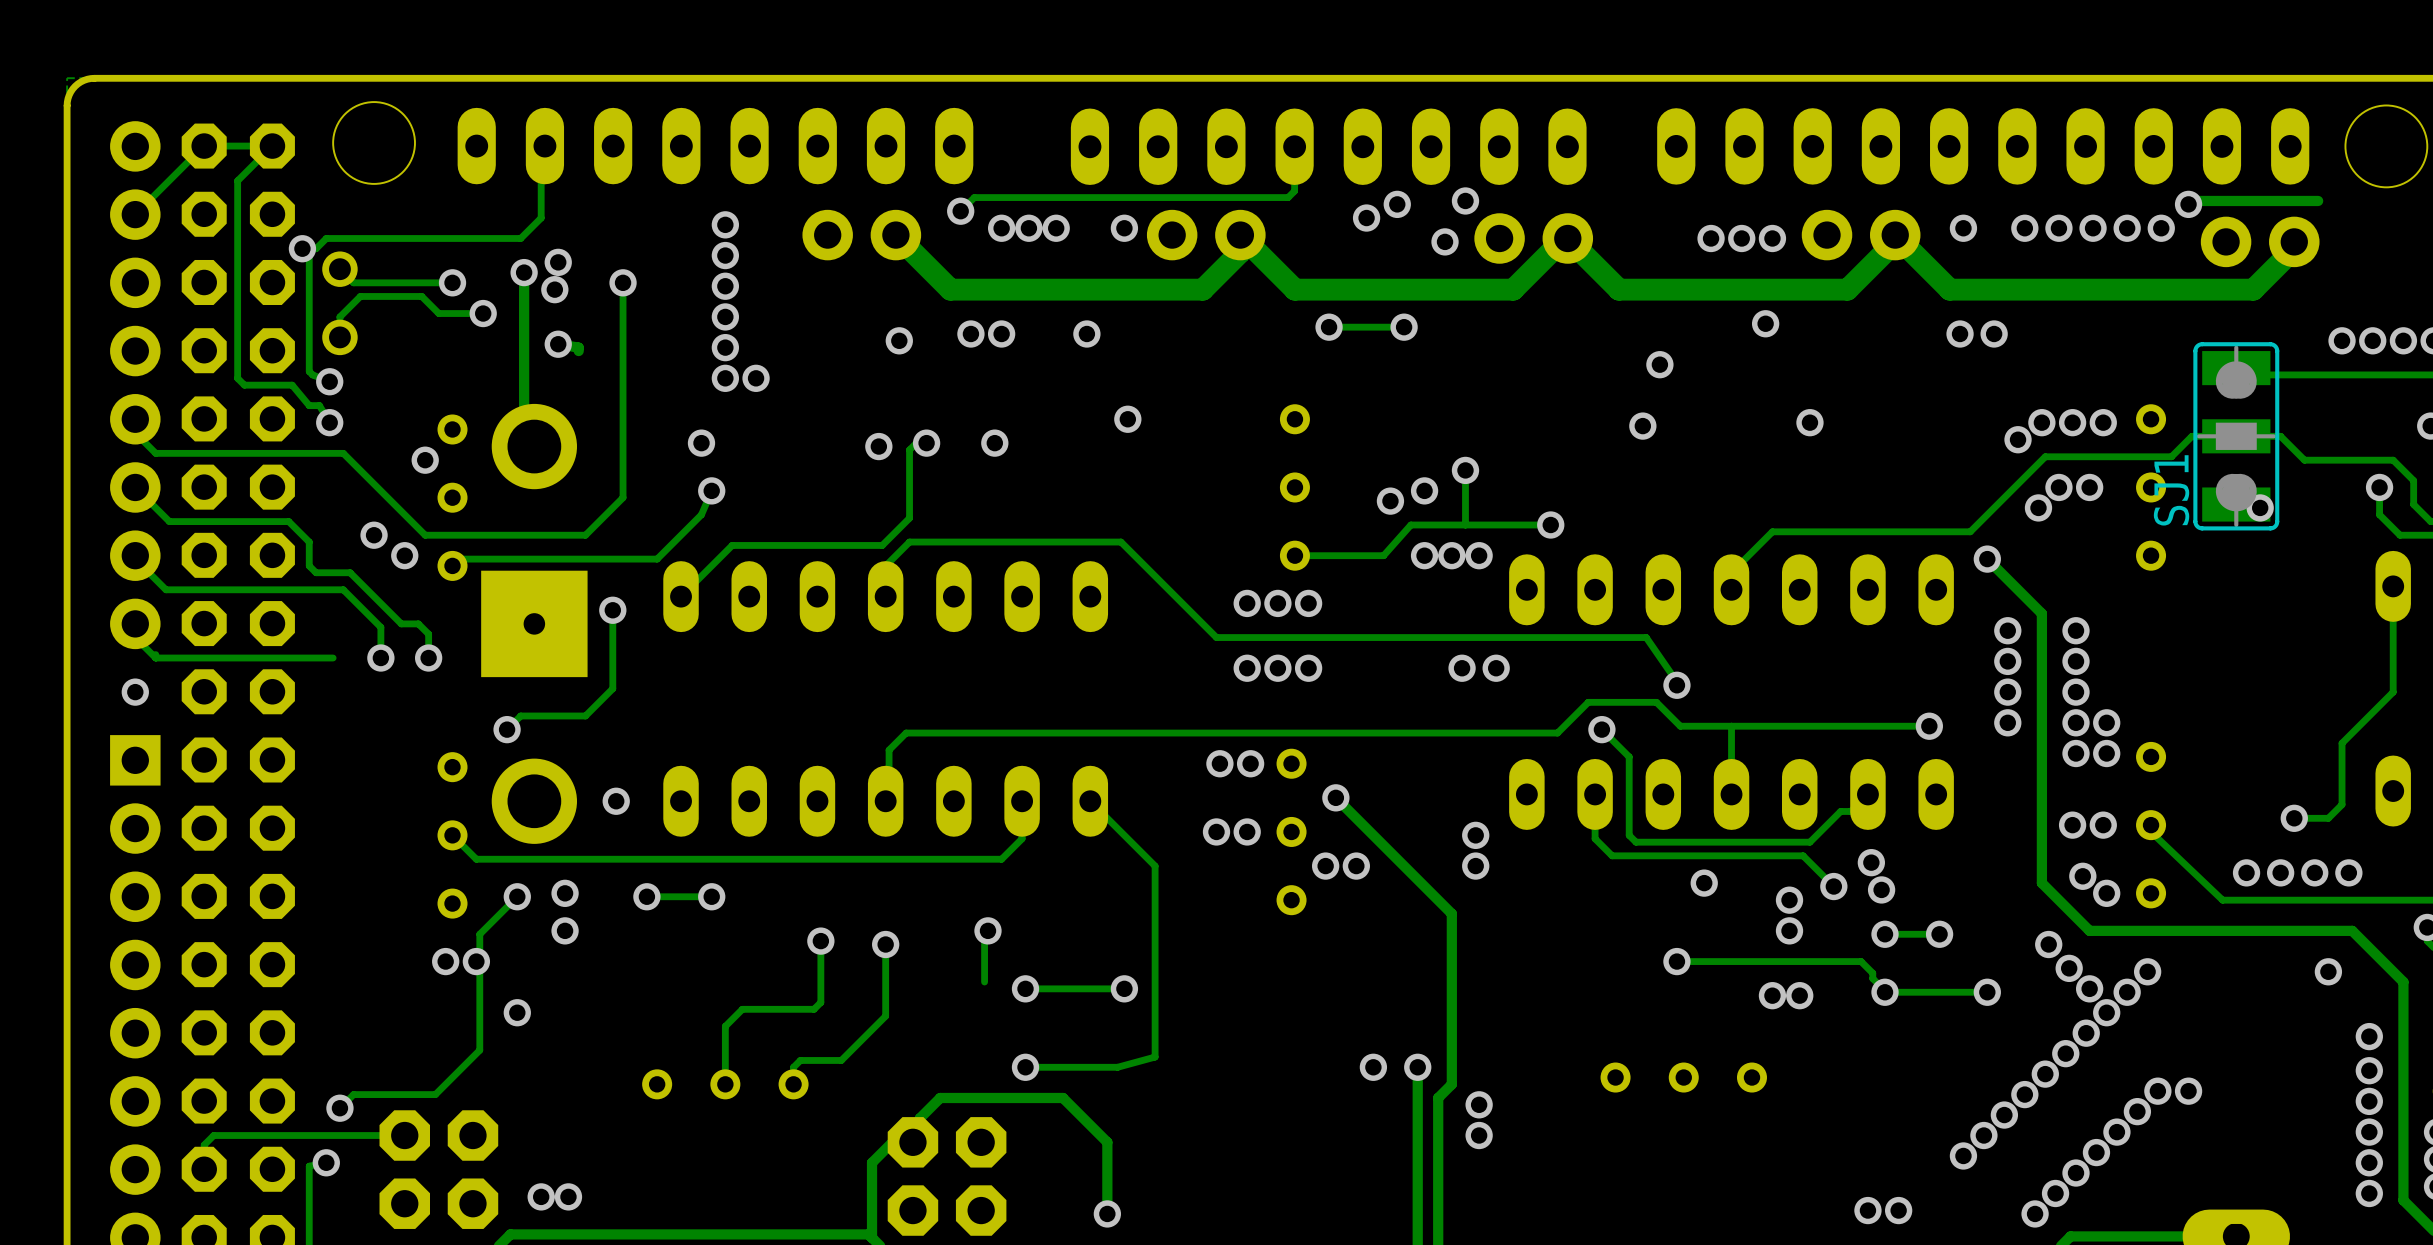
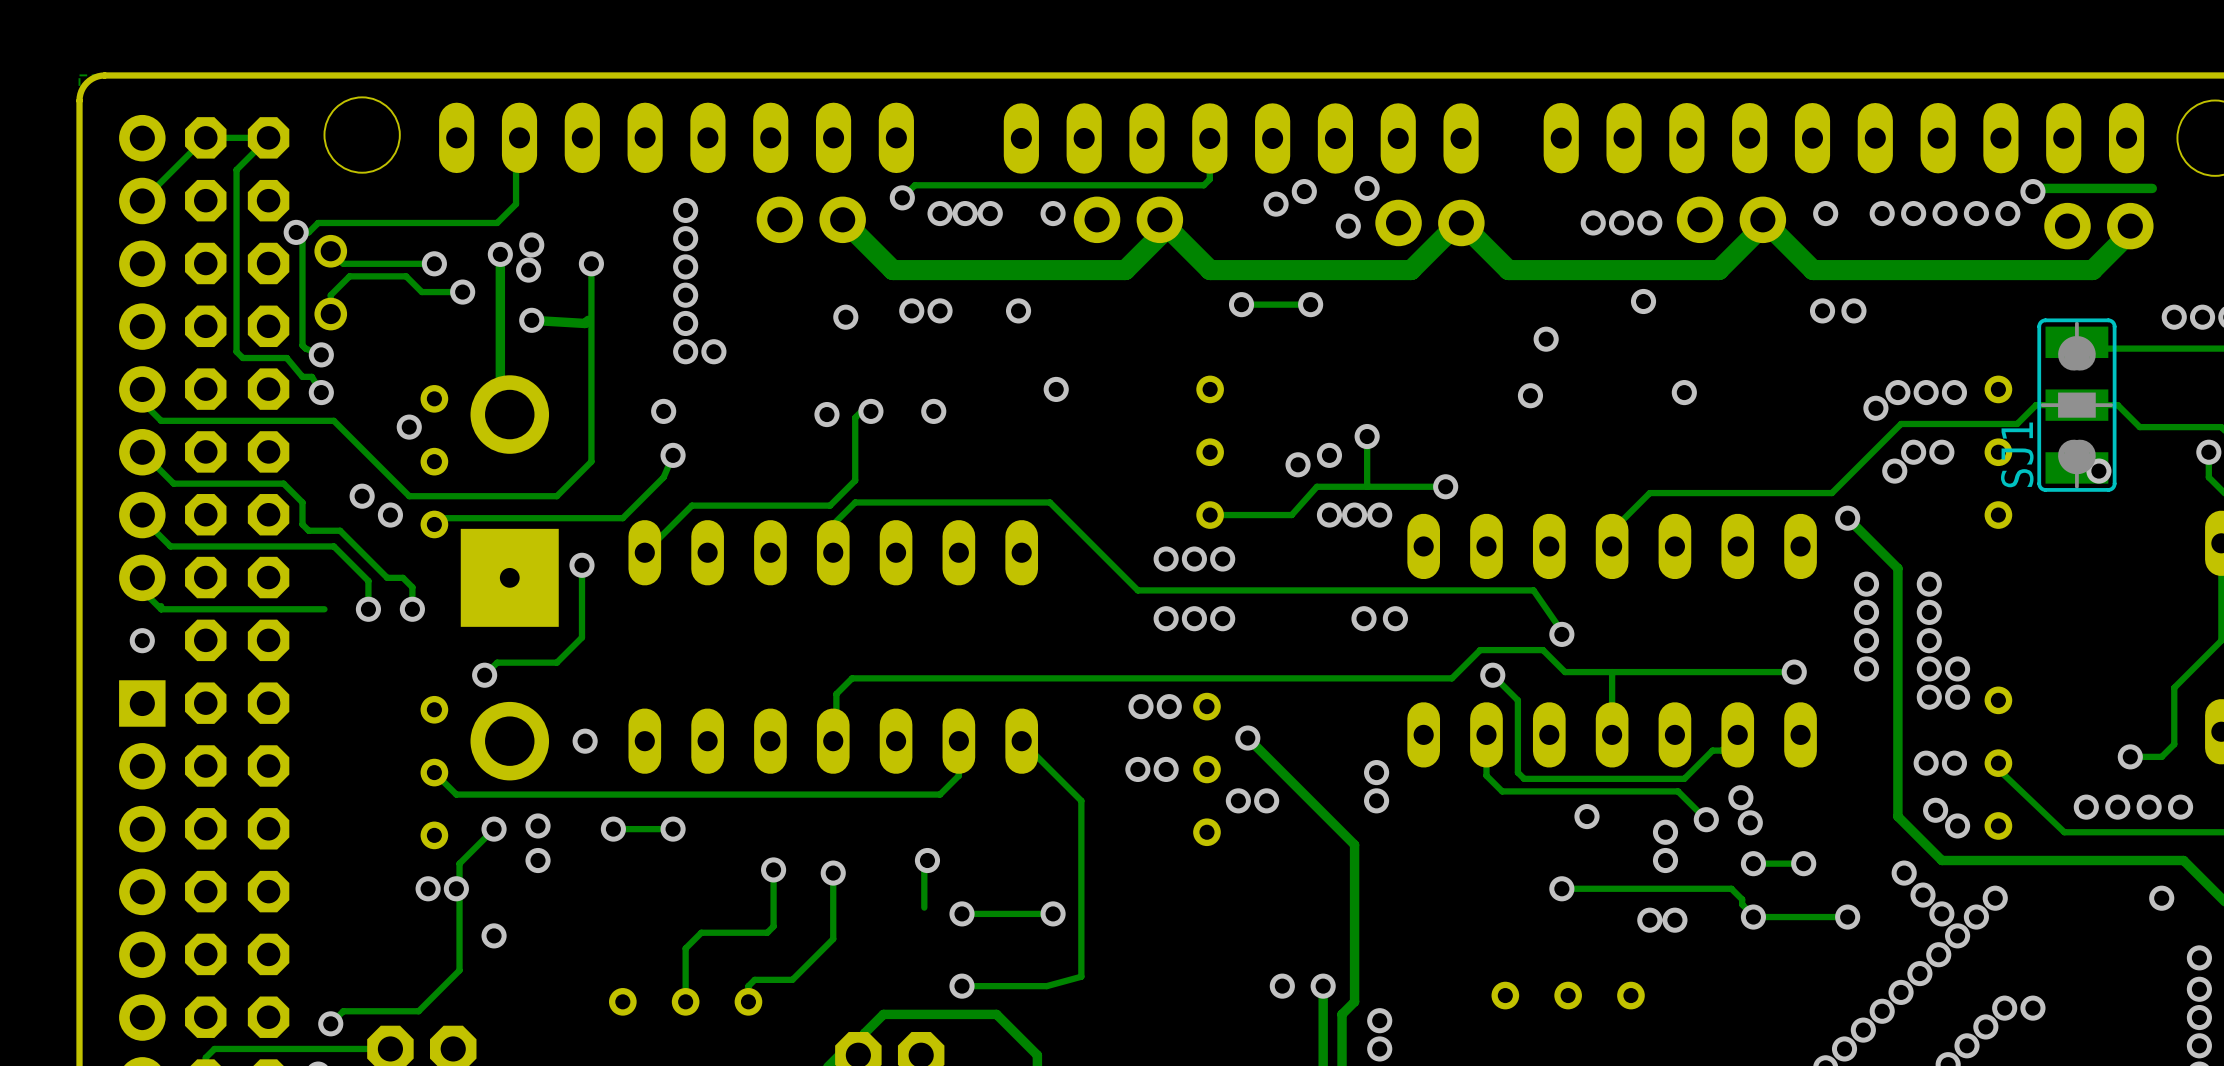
track: (558, 344) (578, 347) (578, 351) -> (531, 320) (585, 323) (588, 320)

